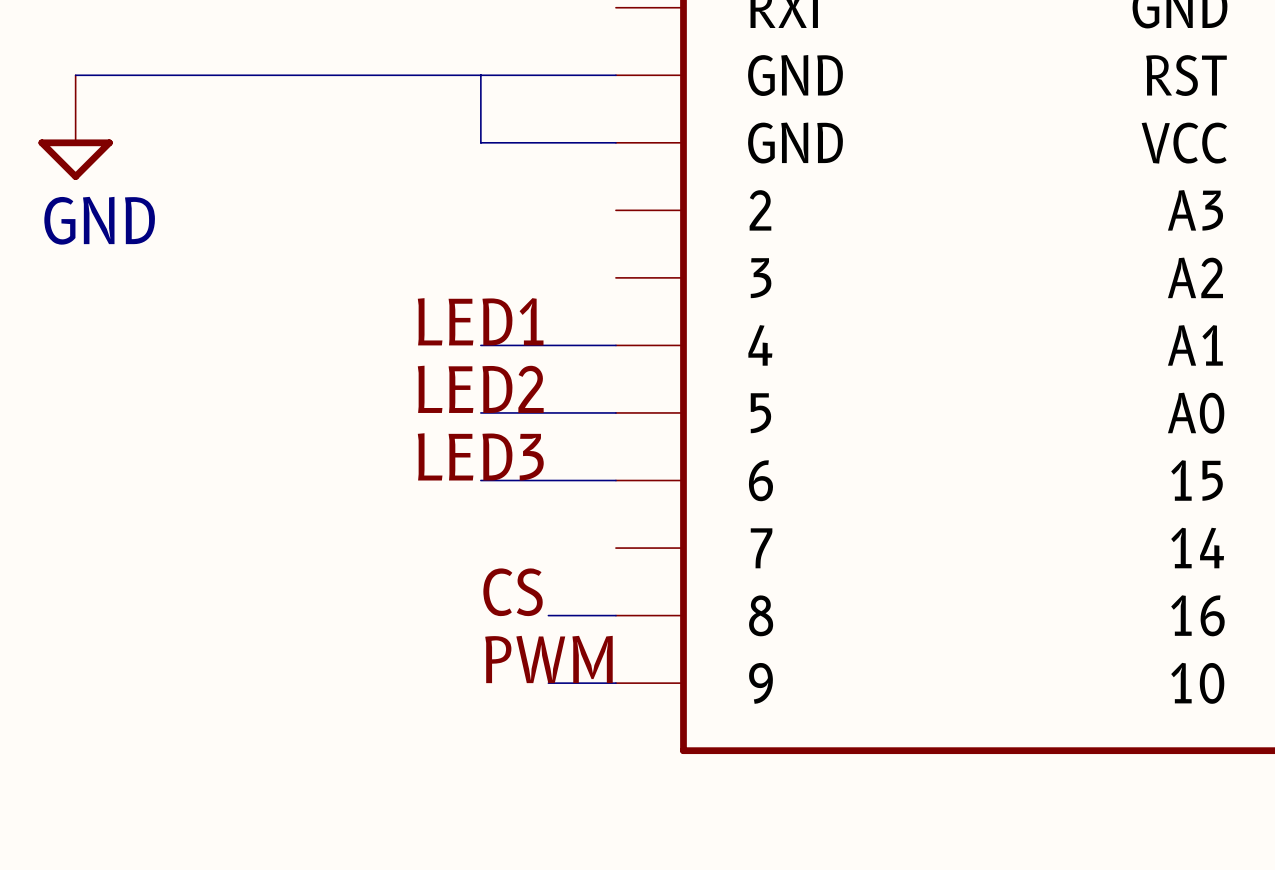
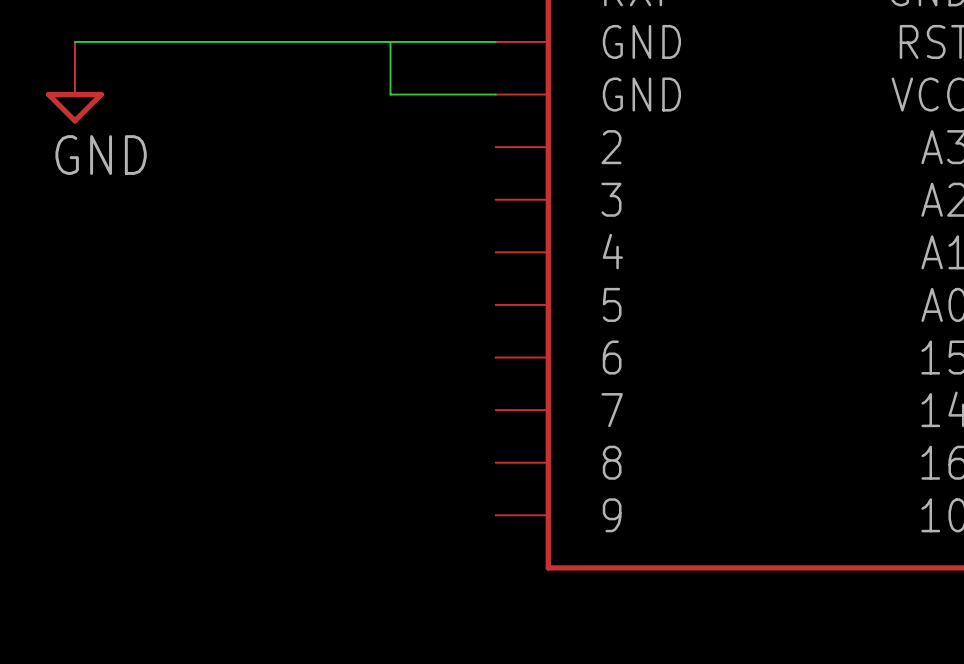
label: LED1 (480, 321) -> none
wire: (480, 345) (615, 345) -> none
label: LED2 (480, 389) -> none
wire: (480, 412) (615, 412) -> none
label: LED3 (480, 456) -> none
wire: (480, 480) (615, 480) -> none
label: CS (513, 592) -> none
wire: (548, 615) (615, 615) -> none
label: PWM (548, 659) -> none
wire: (548, 683) (615, 683) -> none

